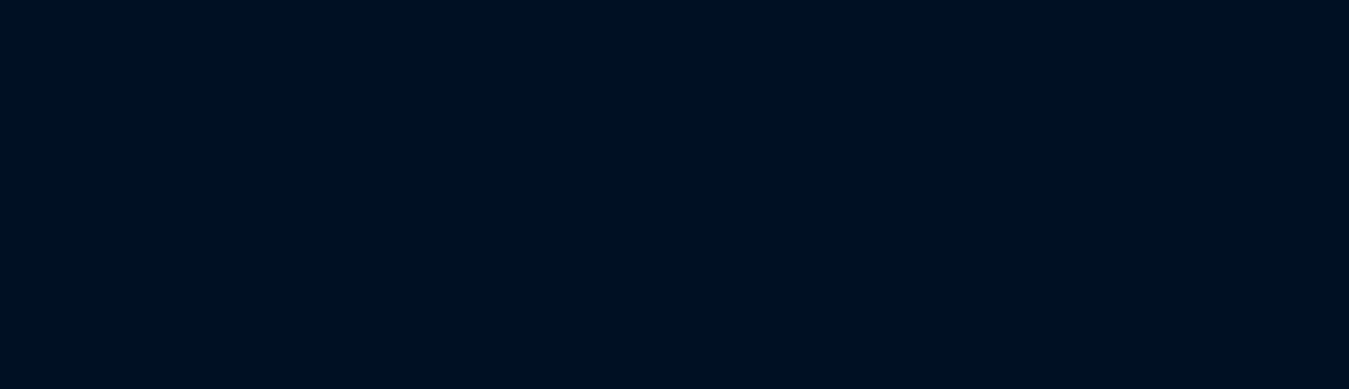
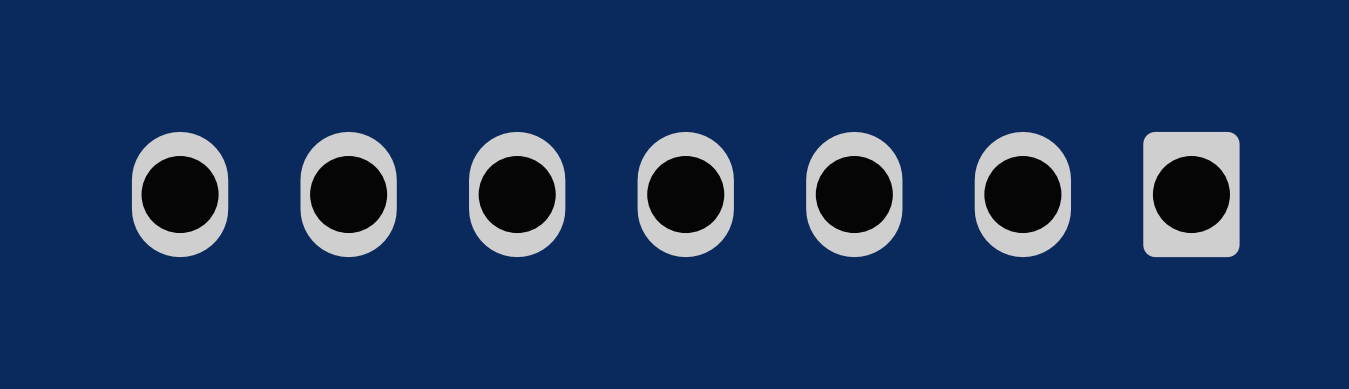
part: none -> (685, 194)

